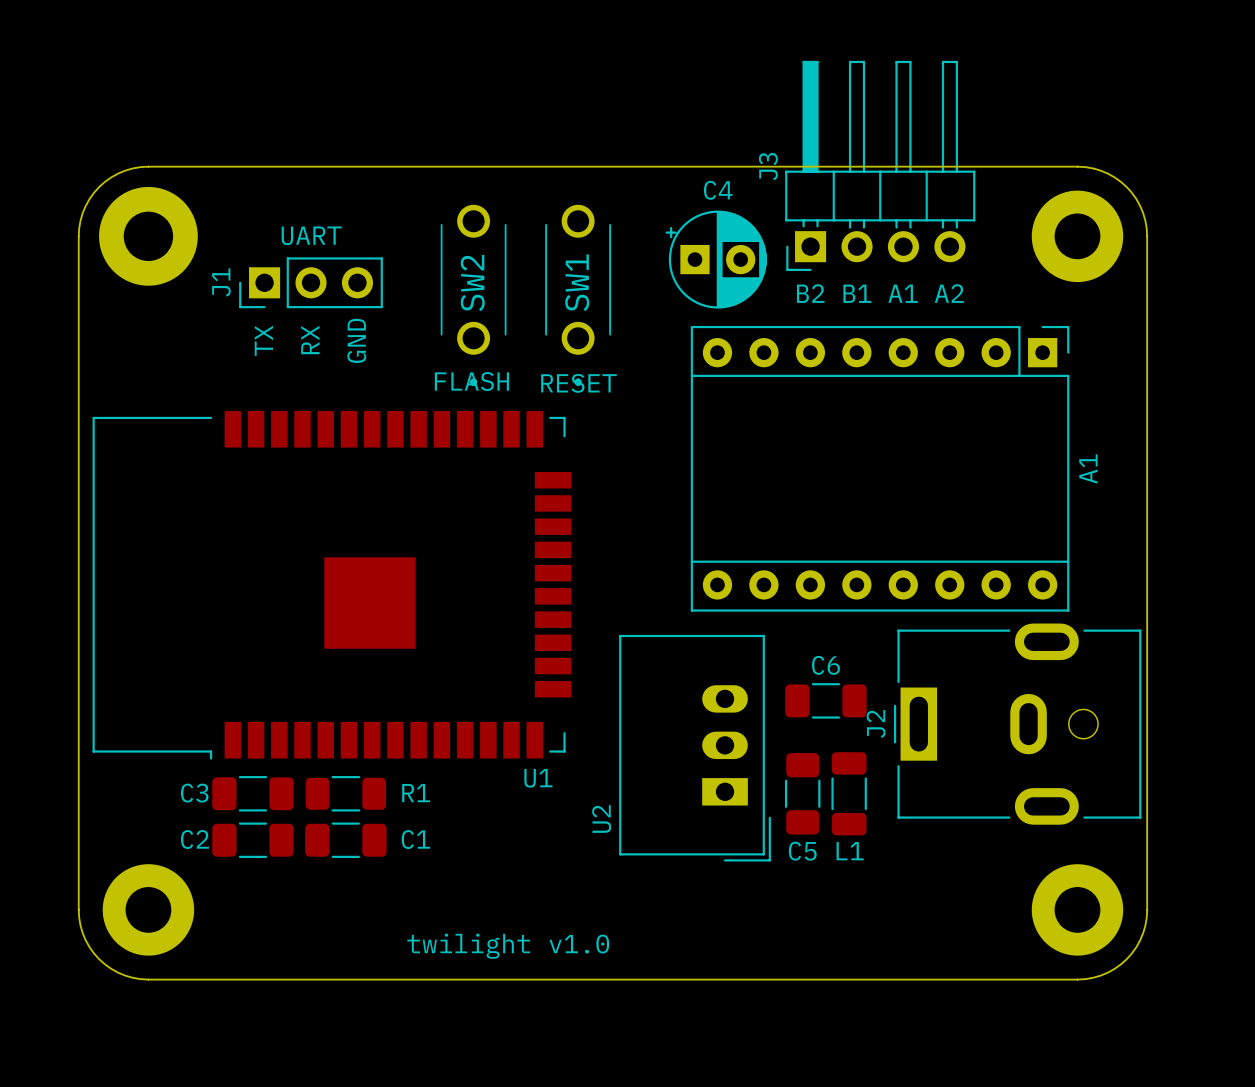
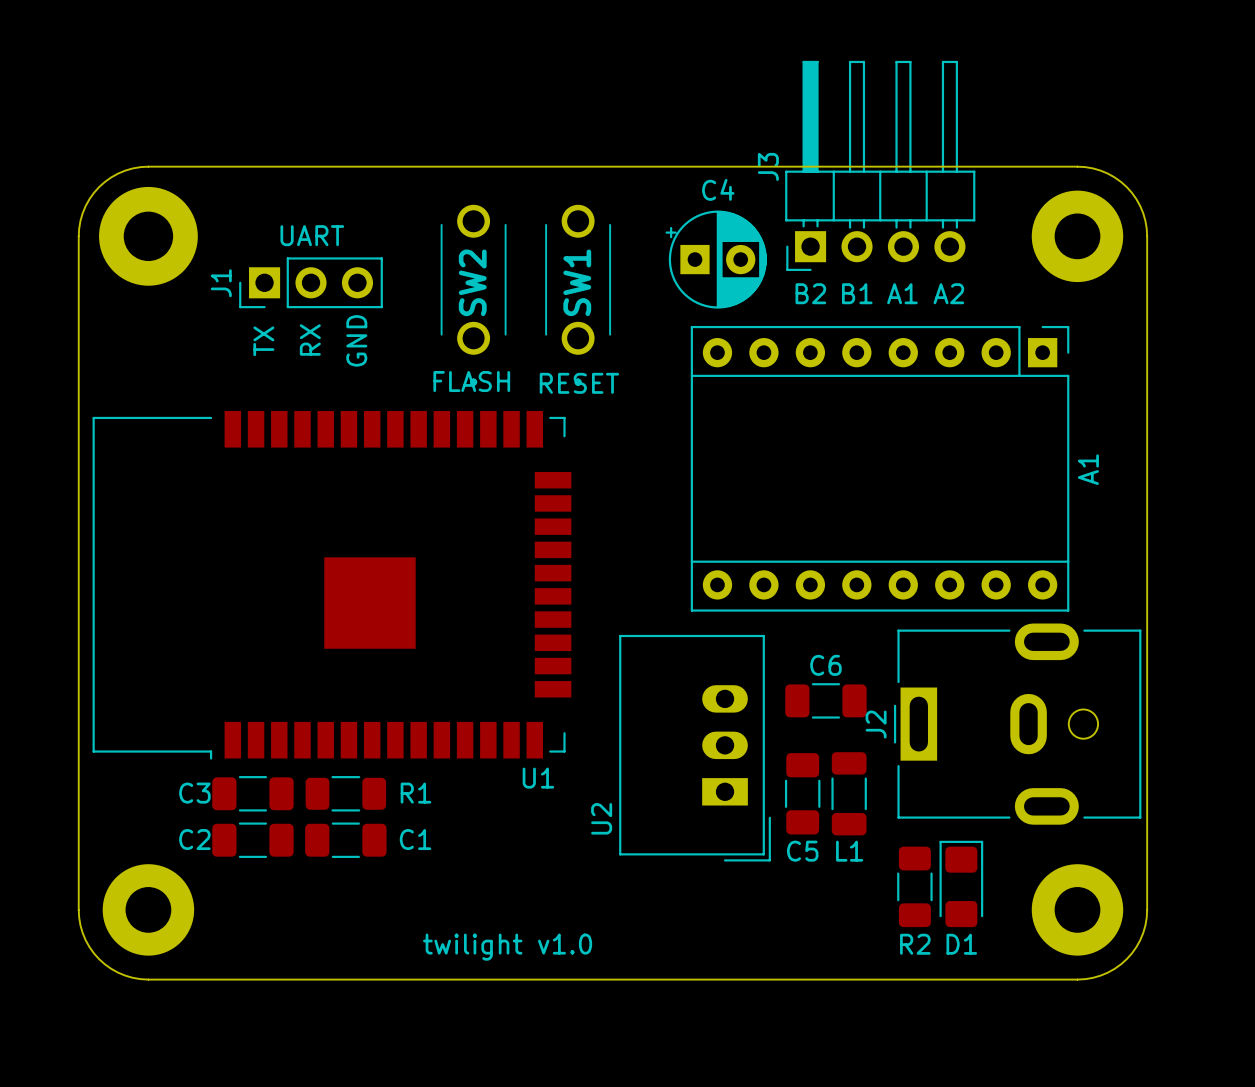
D1: none -> (961, 883)
R2: none -> (914, 886)

